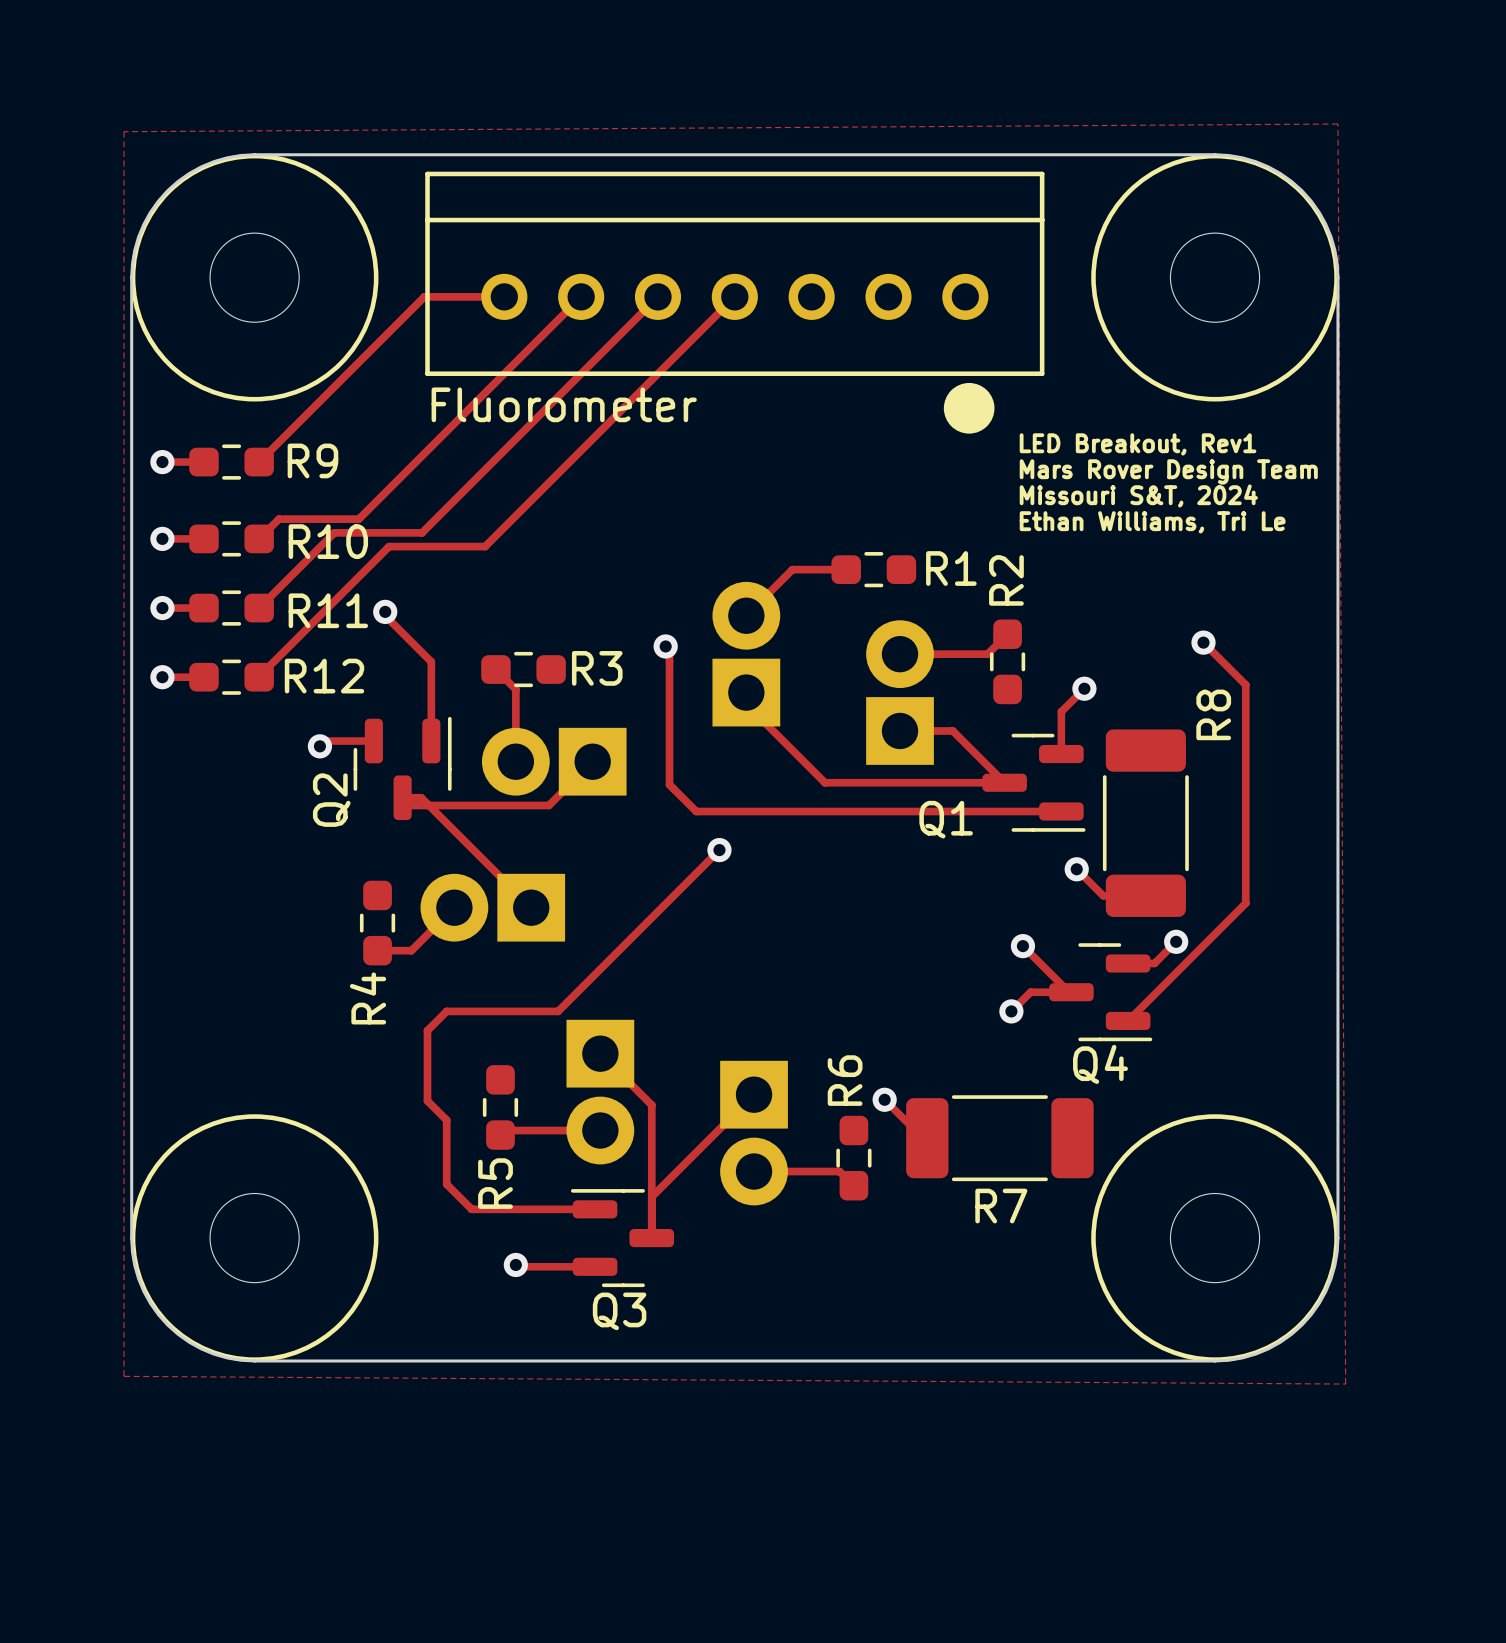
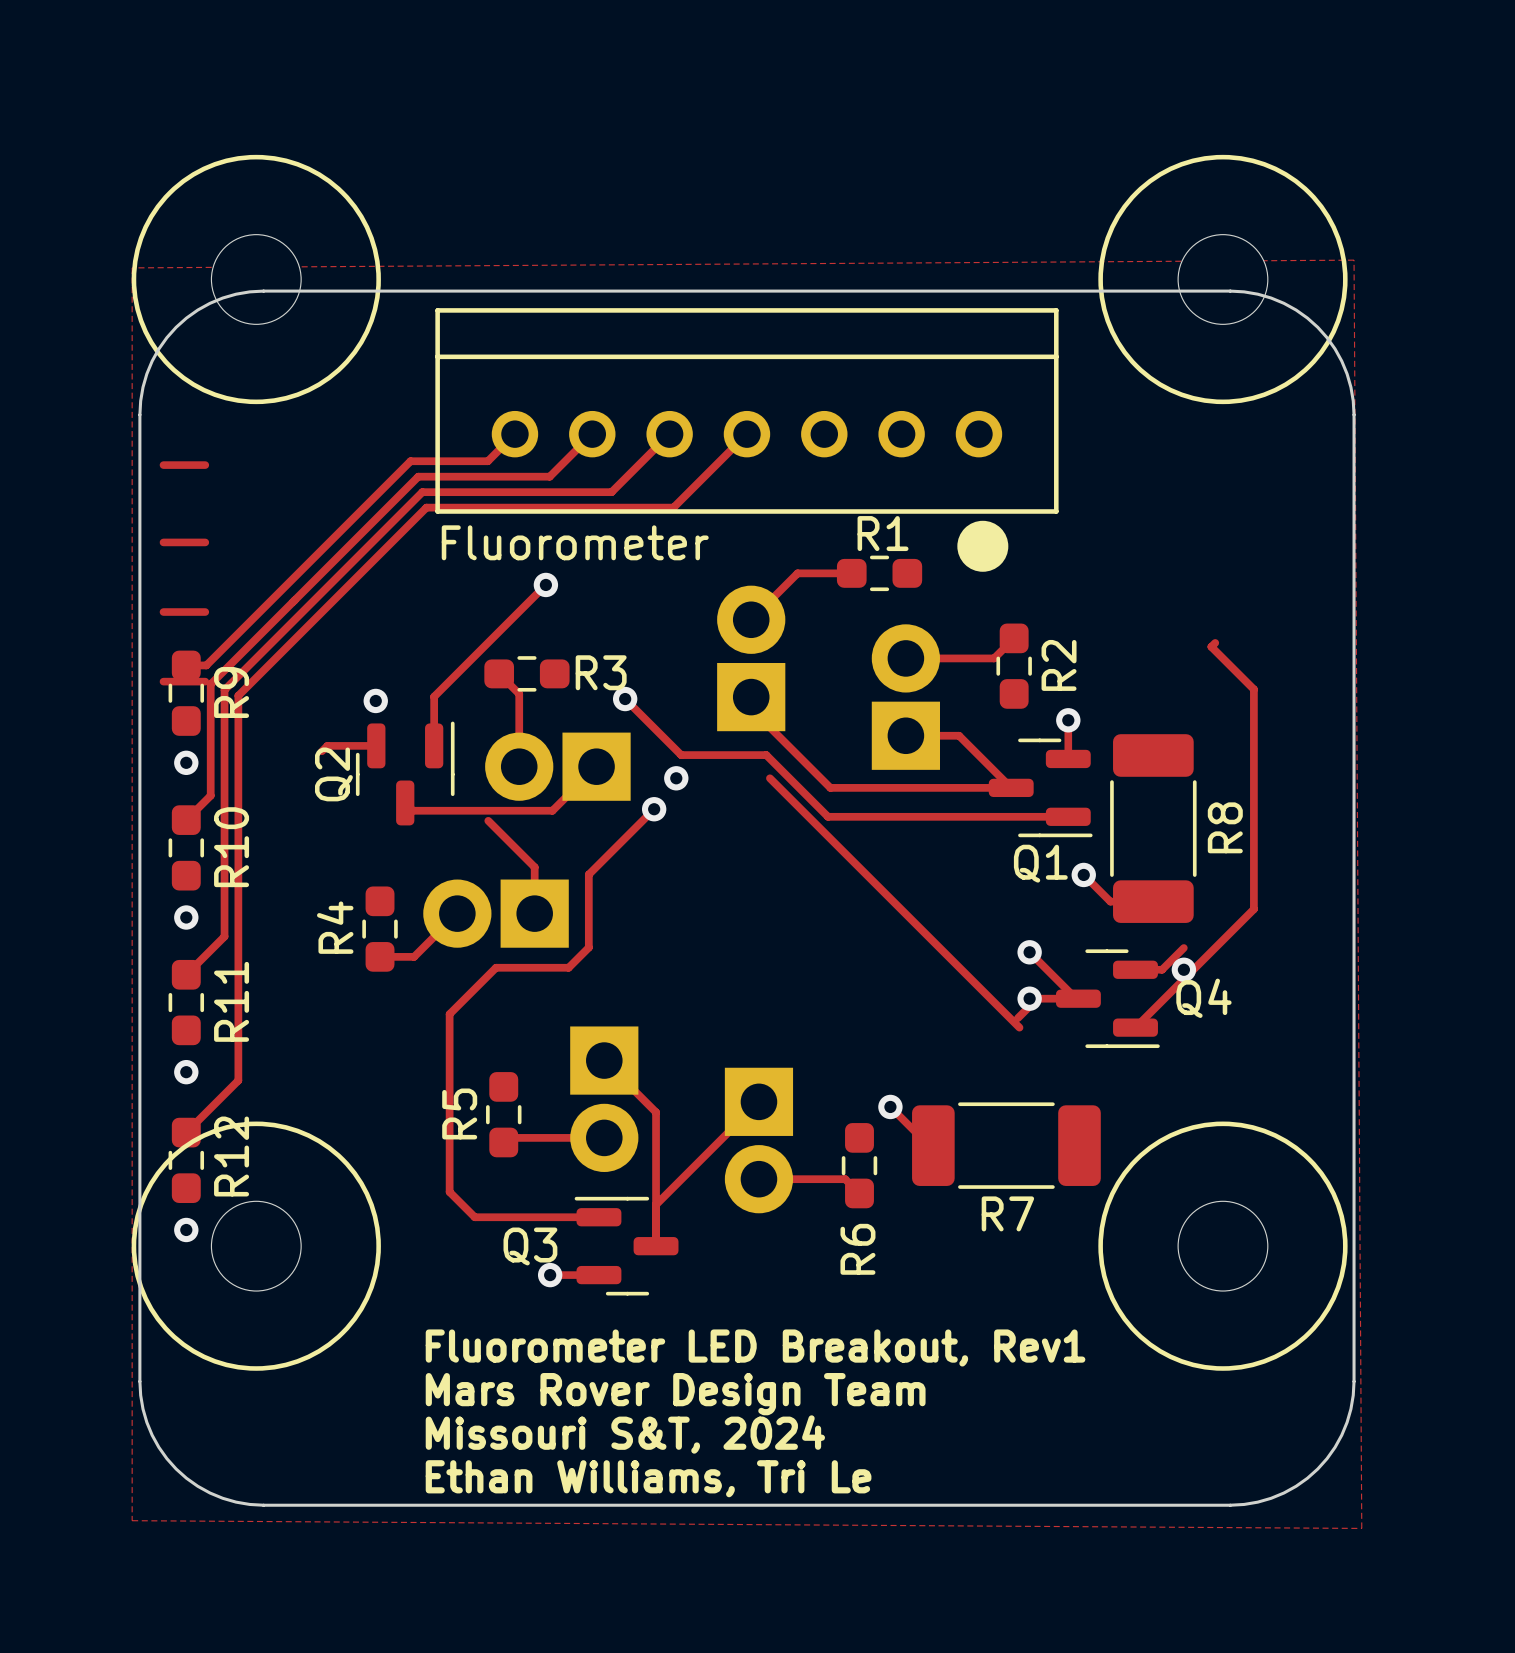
zone outline: (1337, 124) (1345, 1384) (124, 1376) (124, 131) (1337, 124) -> (1354, 260) (1361, 1528) (132, 1520) (132, 267) (1354, 260)
board edge: (254, 154) (1215, 154) (1242, 157) (1268, 166) (1291, 181) (1311, 201) (1325, 224) (1331, 237) (1334, 250) (1337, 277) (1337, 1238) (1334, 1265) (1325, 1291) (1311, 1314) (1291, 1334) (1268, 1348) (1255, 1354) (1242, 1357) (1215, 1361) (254, 1361) (227, 1357) (201, 1348) (177, 1334) (158, 1314) (143, 1291) (138, 1278) (132, 1251) (131, 1238) (132, 263) (134, 250) (143, 224) (150, 212) (167, 190) (189, 173) (201, 166) (227, 157) (254, 154) -> (263, 291) (1230, 291) (1257, 294) (1283, 303) (1307, 318) (1327, 337) (1335, 348) (1347, 373) (1350, 387) (1354, 414) (1354, 1381) (1350, 1409) (1341, 1435) (1327, 1458) (1307, 1478) (1296, 1486) (1271, 1498) (1257, 1502) (1230, 1505) (263, 1505) (236, 1502) (209, 1492) (186, 1478) (166, 1458) (158, 1447) (146, 1422) (142, 1409) (139, 1381) (140, 400) (146, 373) (158, 348) (166, 337) (186, 318) (197, 310) (222, 298) (236, 294) (263, 291)
part position: (734, 273) -> (746, 410)
track: (504, 296) (424, 296) (259, 462) -> none
track: (581, 296) (358, 519) (278, 519) (259, 538) -> none
track: (657, 296) (422, 532) (334, 532) (259, 608) -> none
track: (734, 296) (485, 546) (389, 546) (259, 677) -> none
text position: Fluorometer (564, 404) -> Fluorometer (575, 542)
drawing position: (969, 408) -> (982, 546)
track: none -> (514, 434) (487, 461) (410, 461) (206, 665) (186, 665)
track: none -> (592, 434) (549, 476) (418, 476) (210, 684) (210, 795) (186, 820)
track: none -> (669, 434) (611, 492) (422, 492) (224, 690) (224, 936) (186, 974)
track: none -> (746, 434) (673, 507) (426, 507) (238, 695) (238, 1080) (186, 1132)
text: LED Breakout, Rev1 (1138, 444) -> none
via: (162, 462) -> none
R9 rotation: 0° (231, 462) -> 90° clockwise (186, 693)
R9 position: (231, 462) -> (186, 693)
text: Mars Rover Design Team (1168, 471) -> none
text: Missouri S&T, 2024 (1138, 495) -> none
text: Ethan Williams, Tri Le (1152, 522) -> none
via: (162, 538) -> none
R10 rotation: 0° (231, 538) -> 90° clockwise (186, 847)
R10 position: (231, 538) -> (186, 847)
R1 name position: R1 (951, 568) -> R1 (883, 533)
R2 name position: R2 (1006, 580) -> R2 (1059, 665)
via: none -> (545, 584)
via: (162, 608) -> none
R11 rotation: 0° (231, 608) -> 90° clockwise (186, 1002)
R11 position: (231, 608) -> (186, 1002)
via: (385, 611) -> none
track: (385, 615) (385, 611) (381, 611) (431, 661) (431, 692) -> (545, 584) (434, 696)
via: (1203, 642) -> none
track: (665, 646) (669, 650) (669, 784) (696, 811) (822, 811) -> (625, 699) (681, 755) (766, 755) (828, 816)
via: (665, 646) -> none
via: (162, 677) -> none
R12 rotation: 0° (231, 677) -> 90° clockwise (186, 1160)
R12 position: (231, 677) -> (186, 1160)
track: (1084, 688) (1061, 711) (1061, 715) -> none
via position: (1084, 688) -> (1068, 720)
via: none -> (625, 699)
via: none -> (375, 700)
R8 name position: R8 (1213, 714) -> R8 (1225, 827)
via: (319, 746) -> none
via: none -> (186, 762)
via: none -> (676, 778)
track: none -> (769, 778) (1019, 1027)
track: (402, 797) (421, 797) (531, 907) -> (488, 820) (534, 867) (534, 913)
Q2 name position: Q2 (331, 800) -> Q2 (333, 774)
via: none -> (654, 809)
Q1 name position: Q1 (946, 819) -> Q1 (1040, 863)
track: (719, 850) (558, 1011) (446, 1011) (427, 1030) (427, 1100) (446, 1120) -> (654, 809) (588, 874) (588, 947) (568, 967) (496, 967) (449, 1014) (449, 1127)
via: (719, 850) -> none
via: none -> (186, 917)
via position: (1176, 941) -> (1183, 969)
R4 name position: R4 (368, 998) -> R4 (335, 927)
via position: (1011, 1011) -> (1029, 998)
Q4 name position: Q4 (1100, 1064) -> Q4 (1203, 998)
via: none -> (186, 1072)
R6 name position: R6 (845, 1080) -> R6 (857, 1249)
R5 name position: R5 (495, 1183) -> R5 (459, 1113)
via: none -> (186, 1229)
track: (515, 1264) (517, 1266) (546, 1266) -> none
via position: (515, 1264) -> (550, 1275)
Q3 name position: Q3 (619, 1311) -> Q3 (530, 1246)
text: none -> Fluorometer LED Breakout, Rev1 (755, 1347)
text: none -> Mars Rover Design Team (675, 1394)
text: none -> Missouri S&T, 2024 (625, 1434)
text: none -> Ethan Williams, Tri Le (648, 1478)

